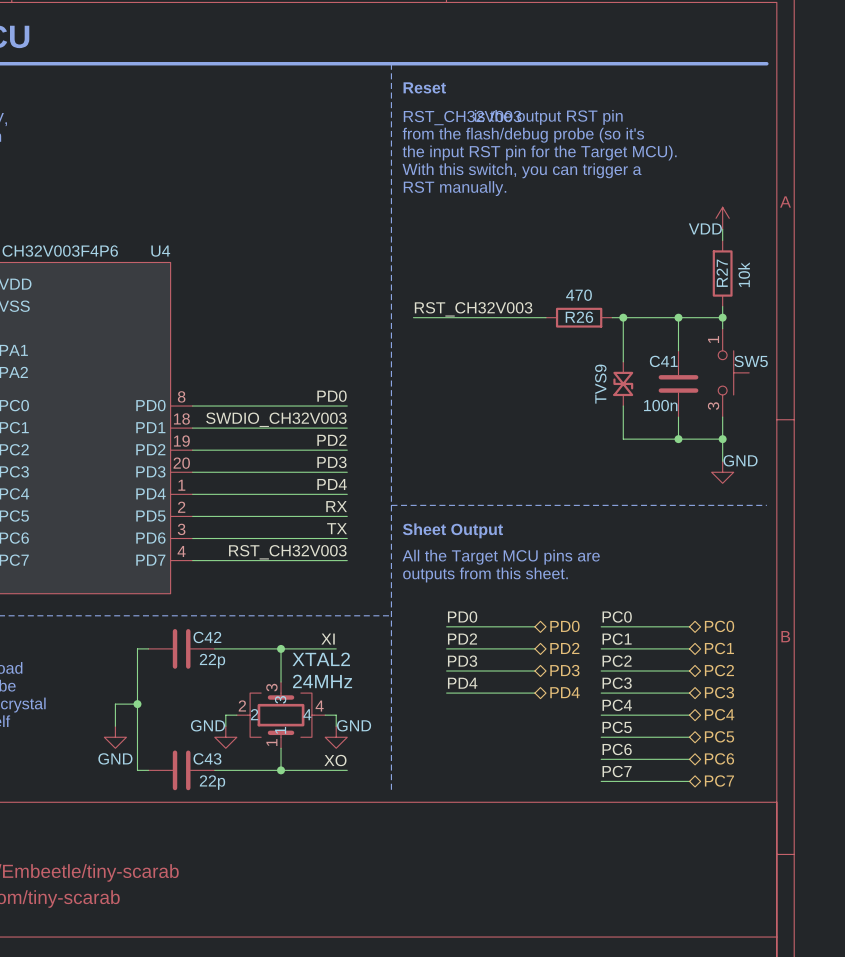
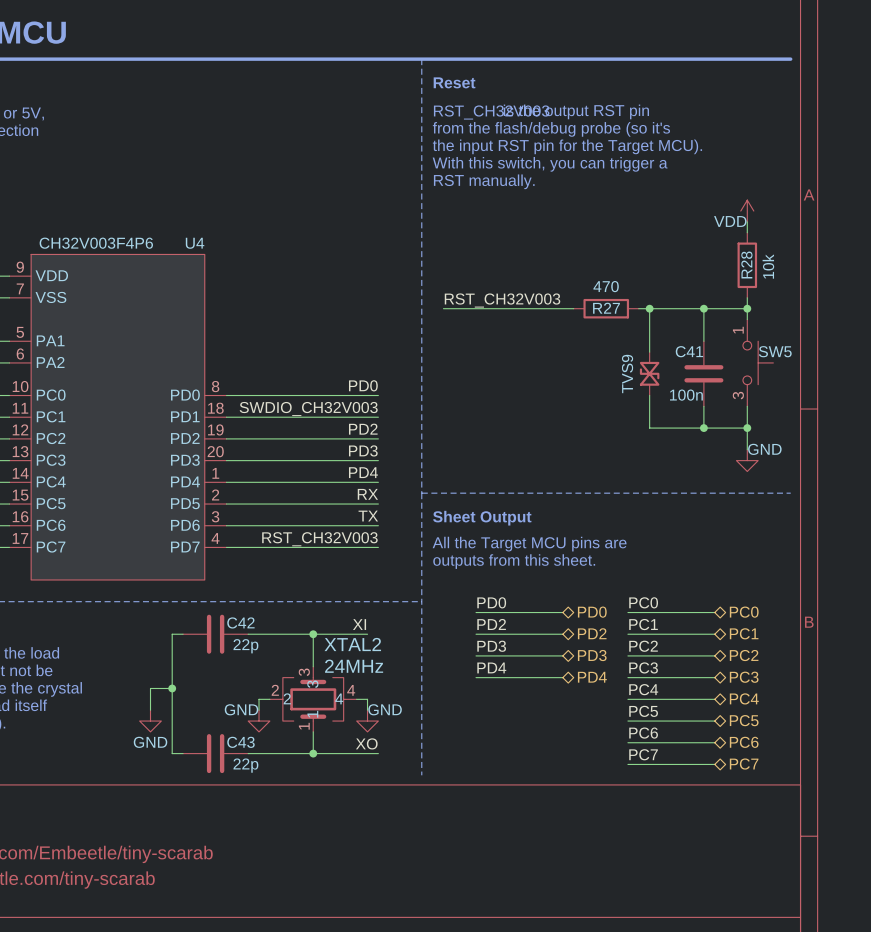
R27 name: R27 (722, 273) -> R28 (746, 264)
R26 name: R26 (579, 317) -> R27 (606, 308)

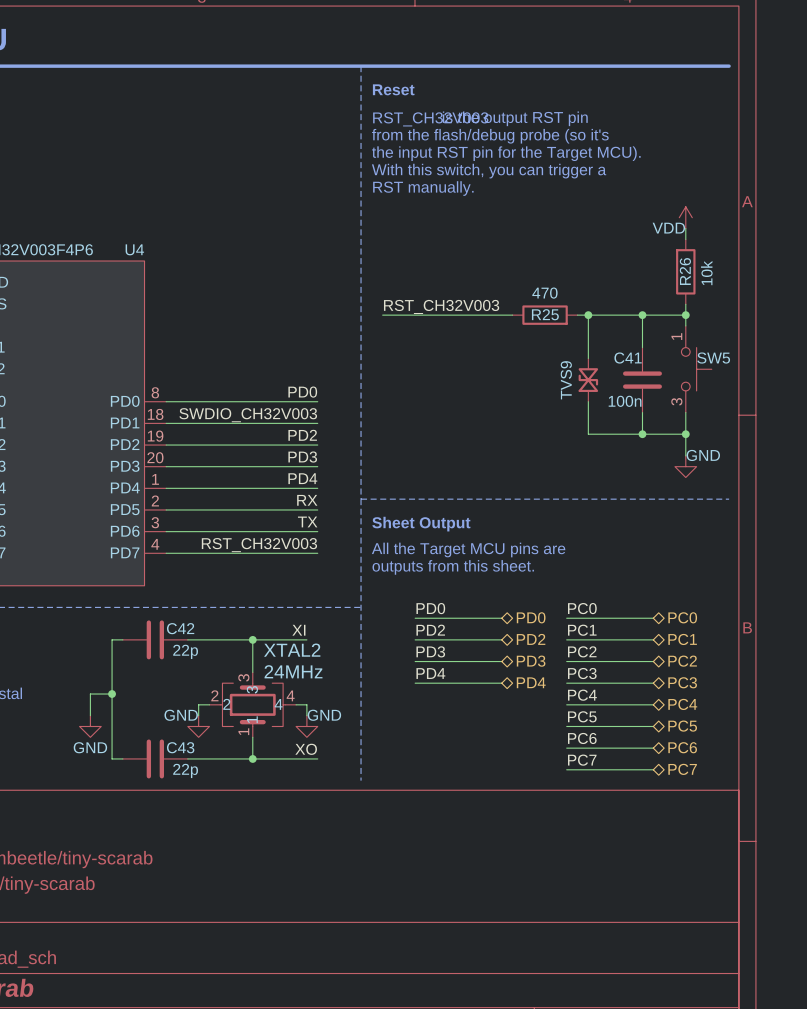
R28 name: R28 (746, 264) -> R26 (685, 271)
R27 name: R27 (606, 308) -> R25 (545, 314)

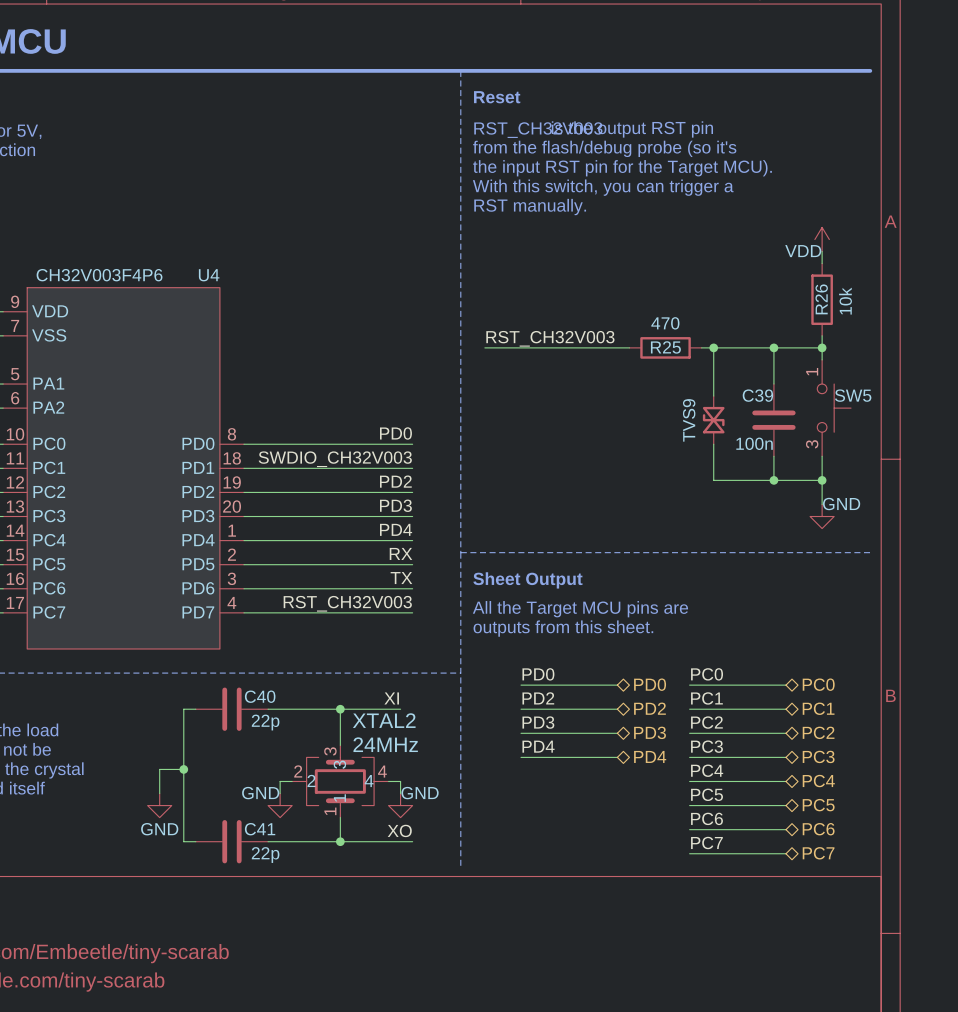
C41 name: C41 (628, 358) -> C39 (757, 395)
C42 name: C42 (180, 628) -> C40 (260, 696)
C43 name: C43 (180, 747) -> C41 (260, 829)

